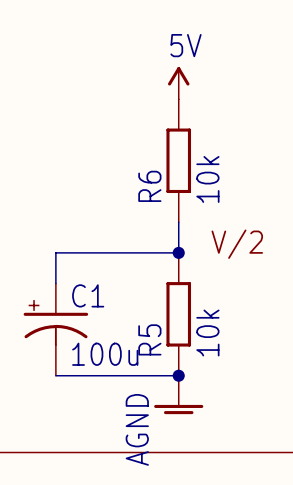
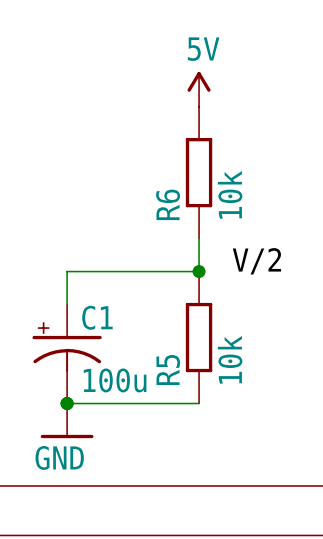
junction: none -> (67, 403)
junction: (178, 375) -> none
power symbol: none -> GND (67, 420)
power symbol: AGND (178, 394) -> none

